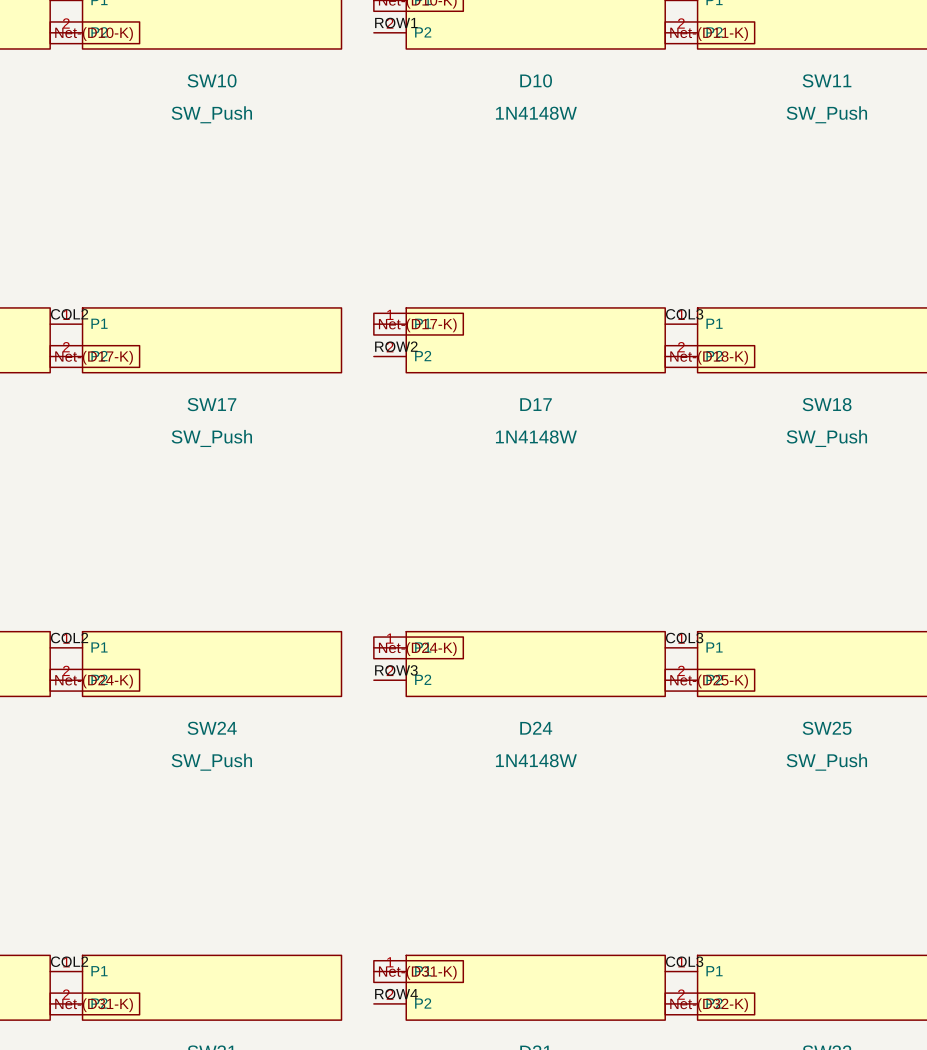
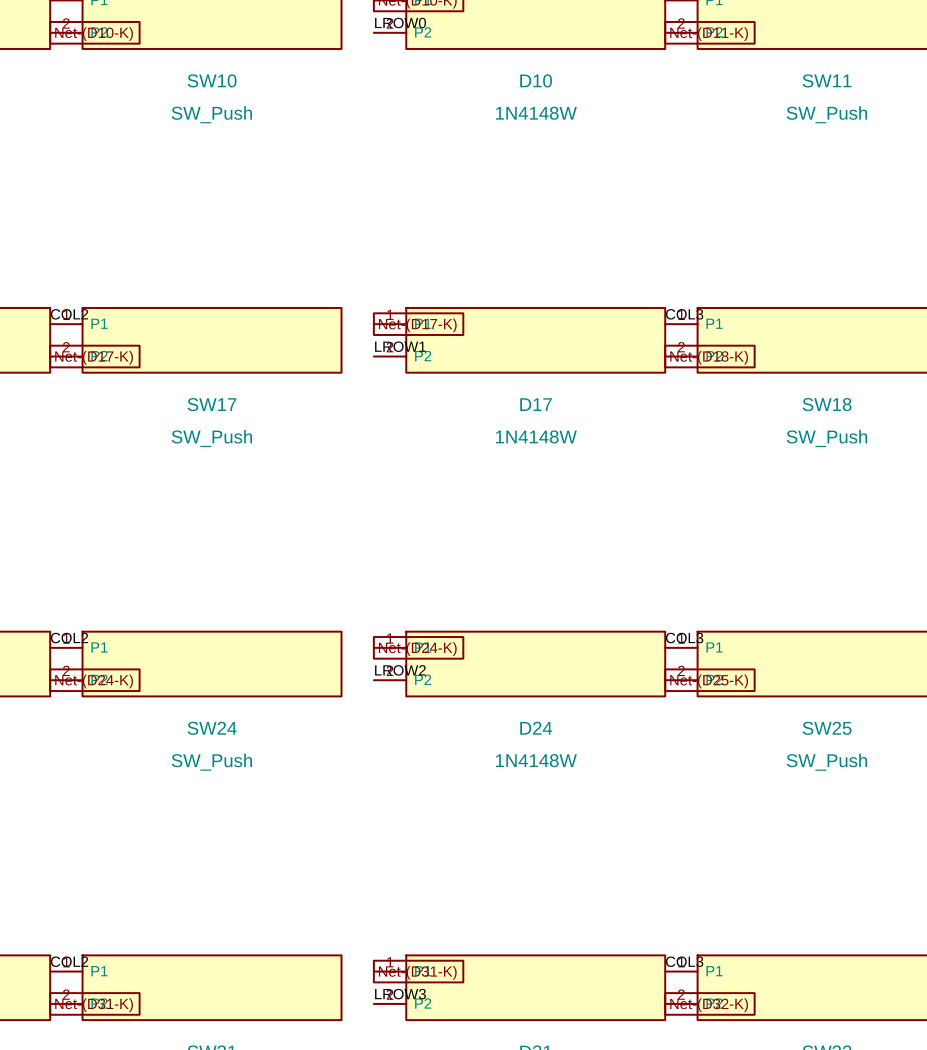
label: ROW1 (396, 22) -> LROW0 (400, 22)
label: ROW2 (396, 346) -> LROW1 (400, 346)
label: ROW3 (396, 670) -> LROW2 (400, 670)
label: ROW4 (396, 994) -> LROW3 (400, 994)

